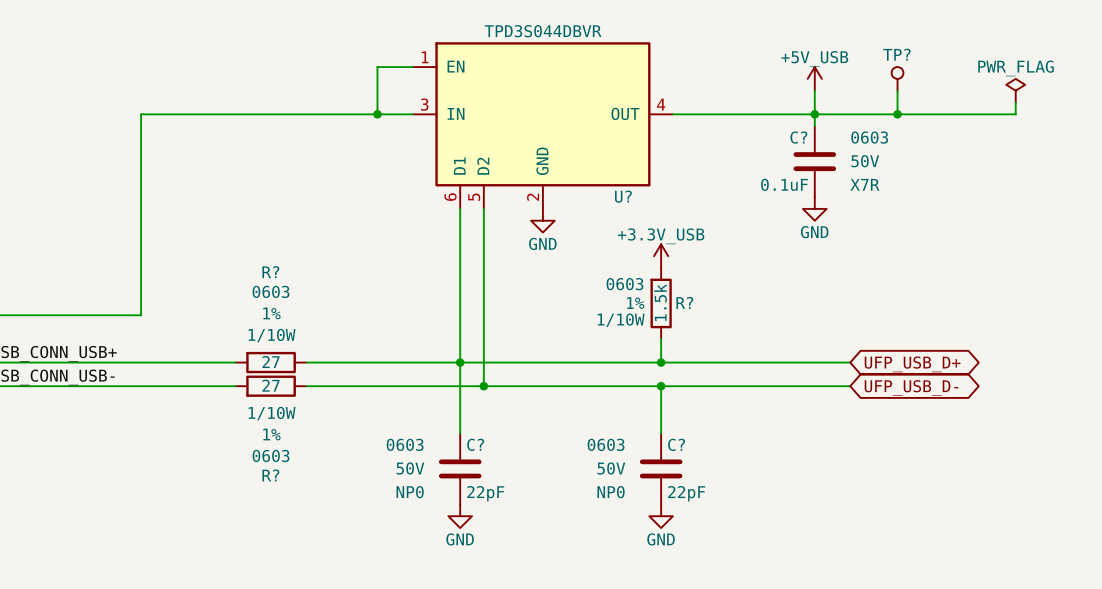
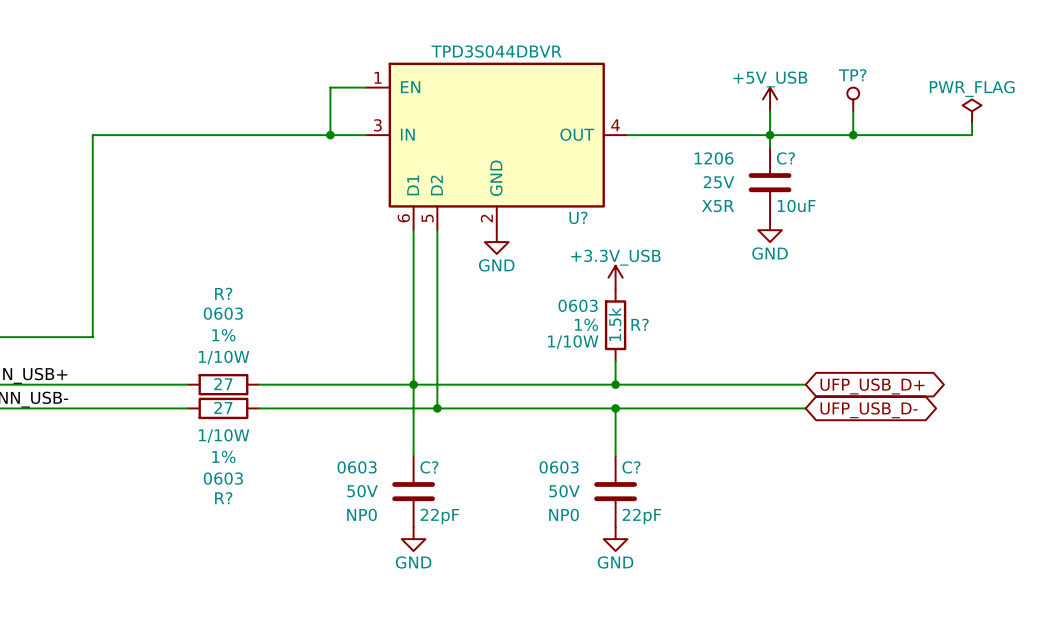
C? name position: C? (798, 137) -> C? (785, 158)
C? text: 0603 (869, 137) -> 1206 (714, 158)
C? text: 50V (865, 161) -> 25V (719, 182)
C? value: 0.1uF (784, 184) -> 10uF (796, 205)
C? text: X7R (864, 184) -> X5R (718, 206)

